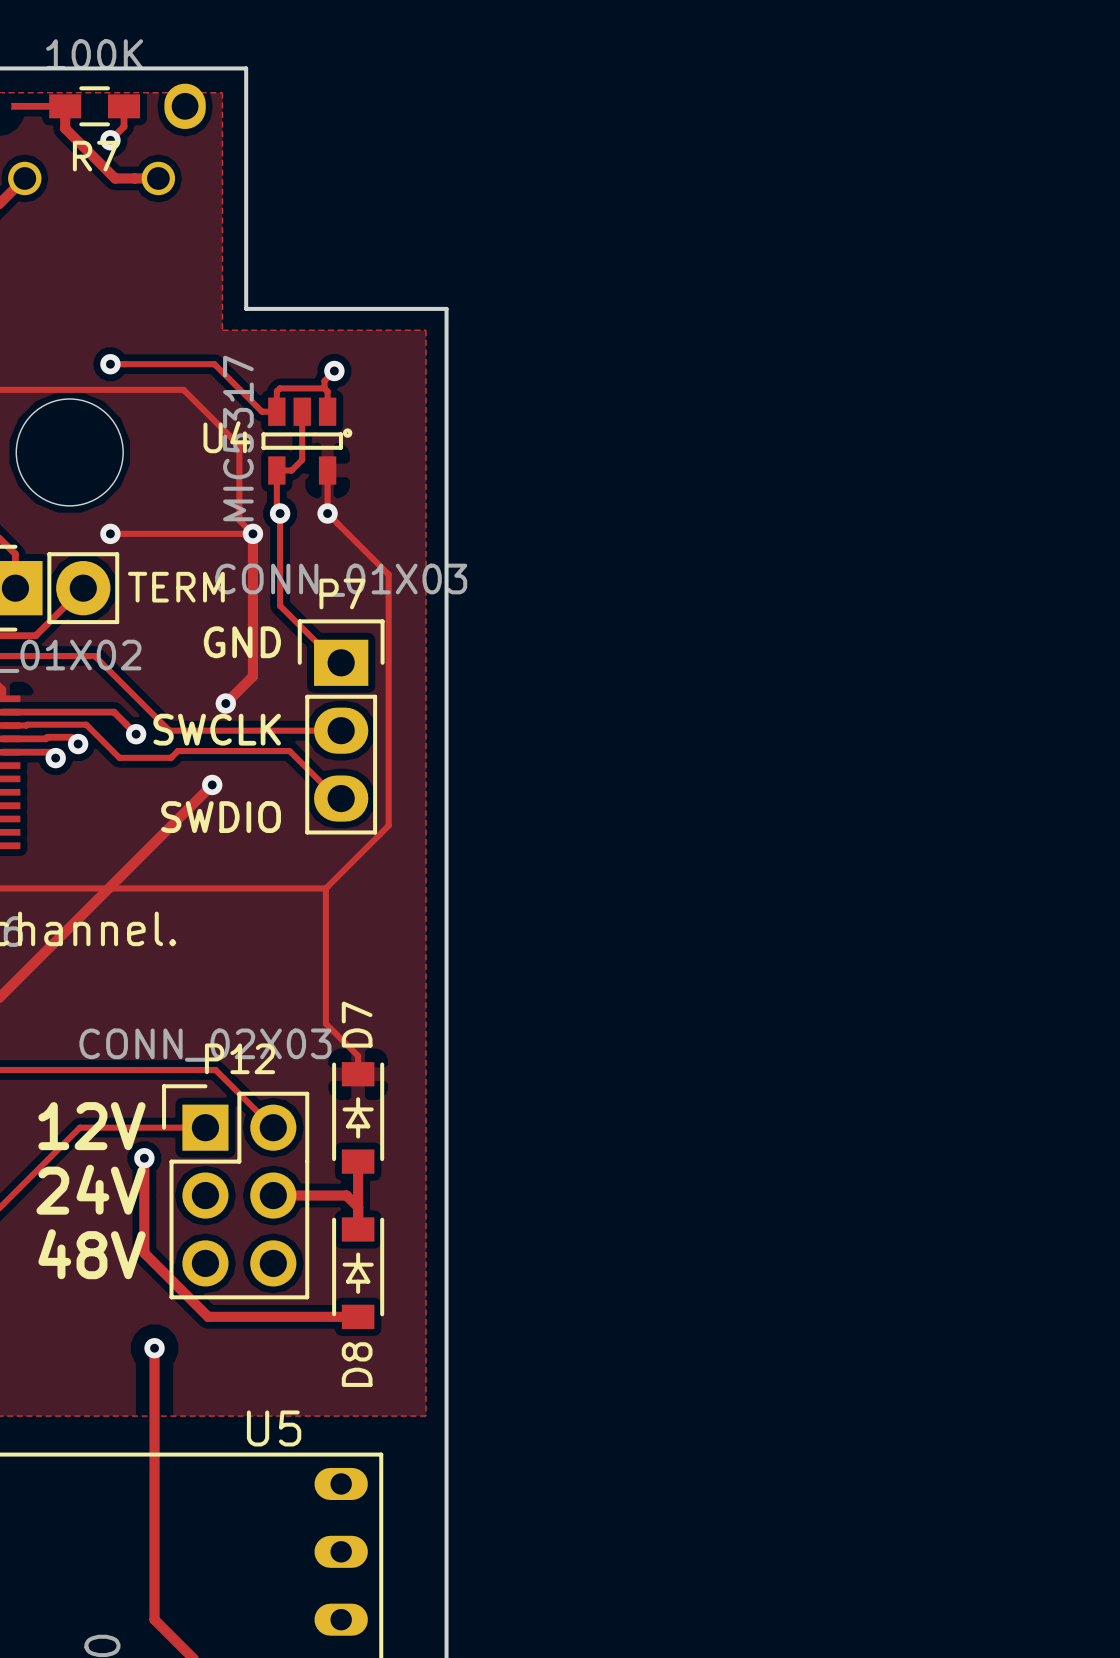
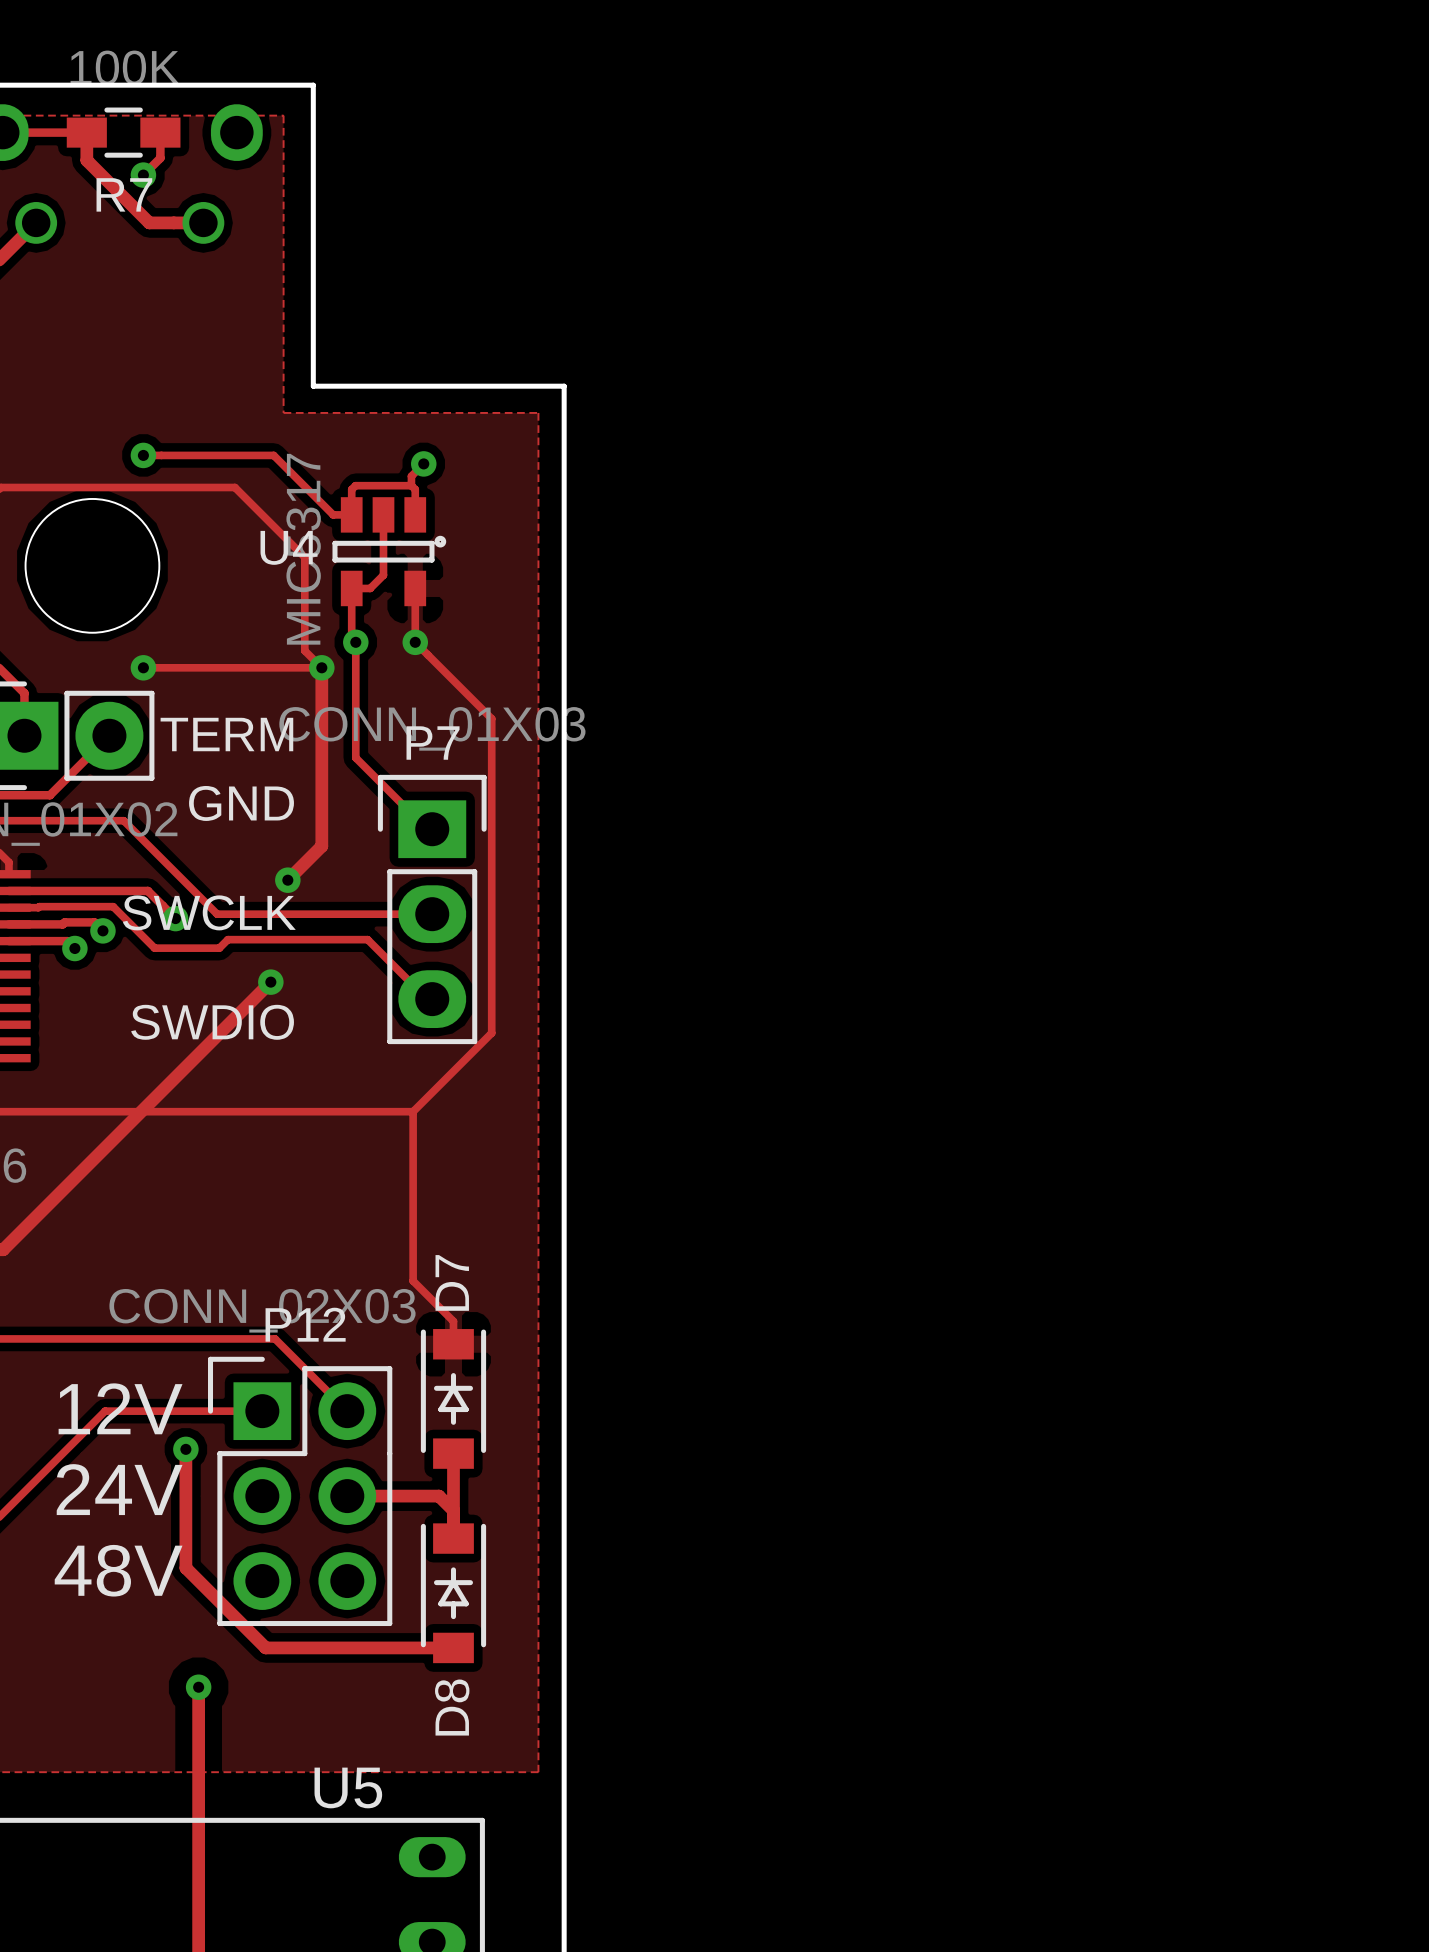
text position: GND (242, 642) -> GND (241, 803)
text position: SWCLK (217, 729) -> SWCLK (209, 912)
text position: SWDIO (221, 817) -> SWDIO (212, 1022)

